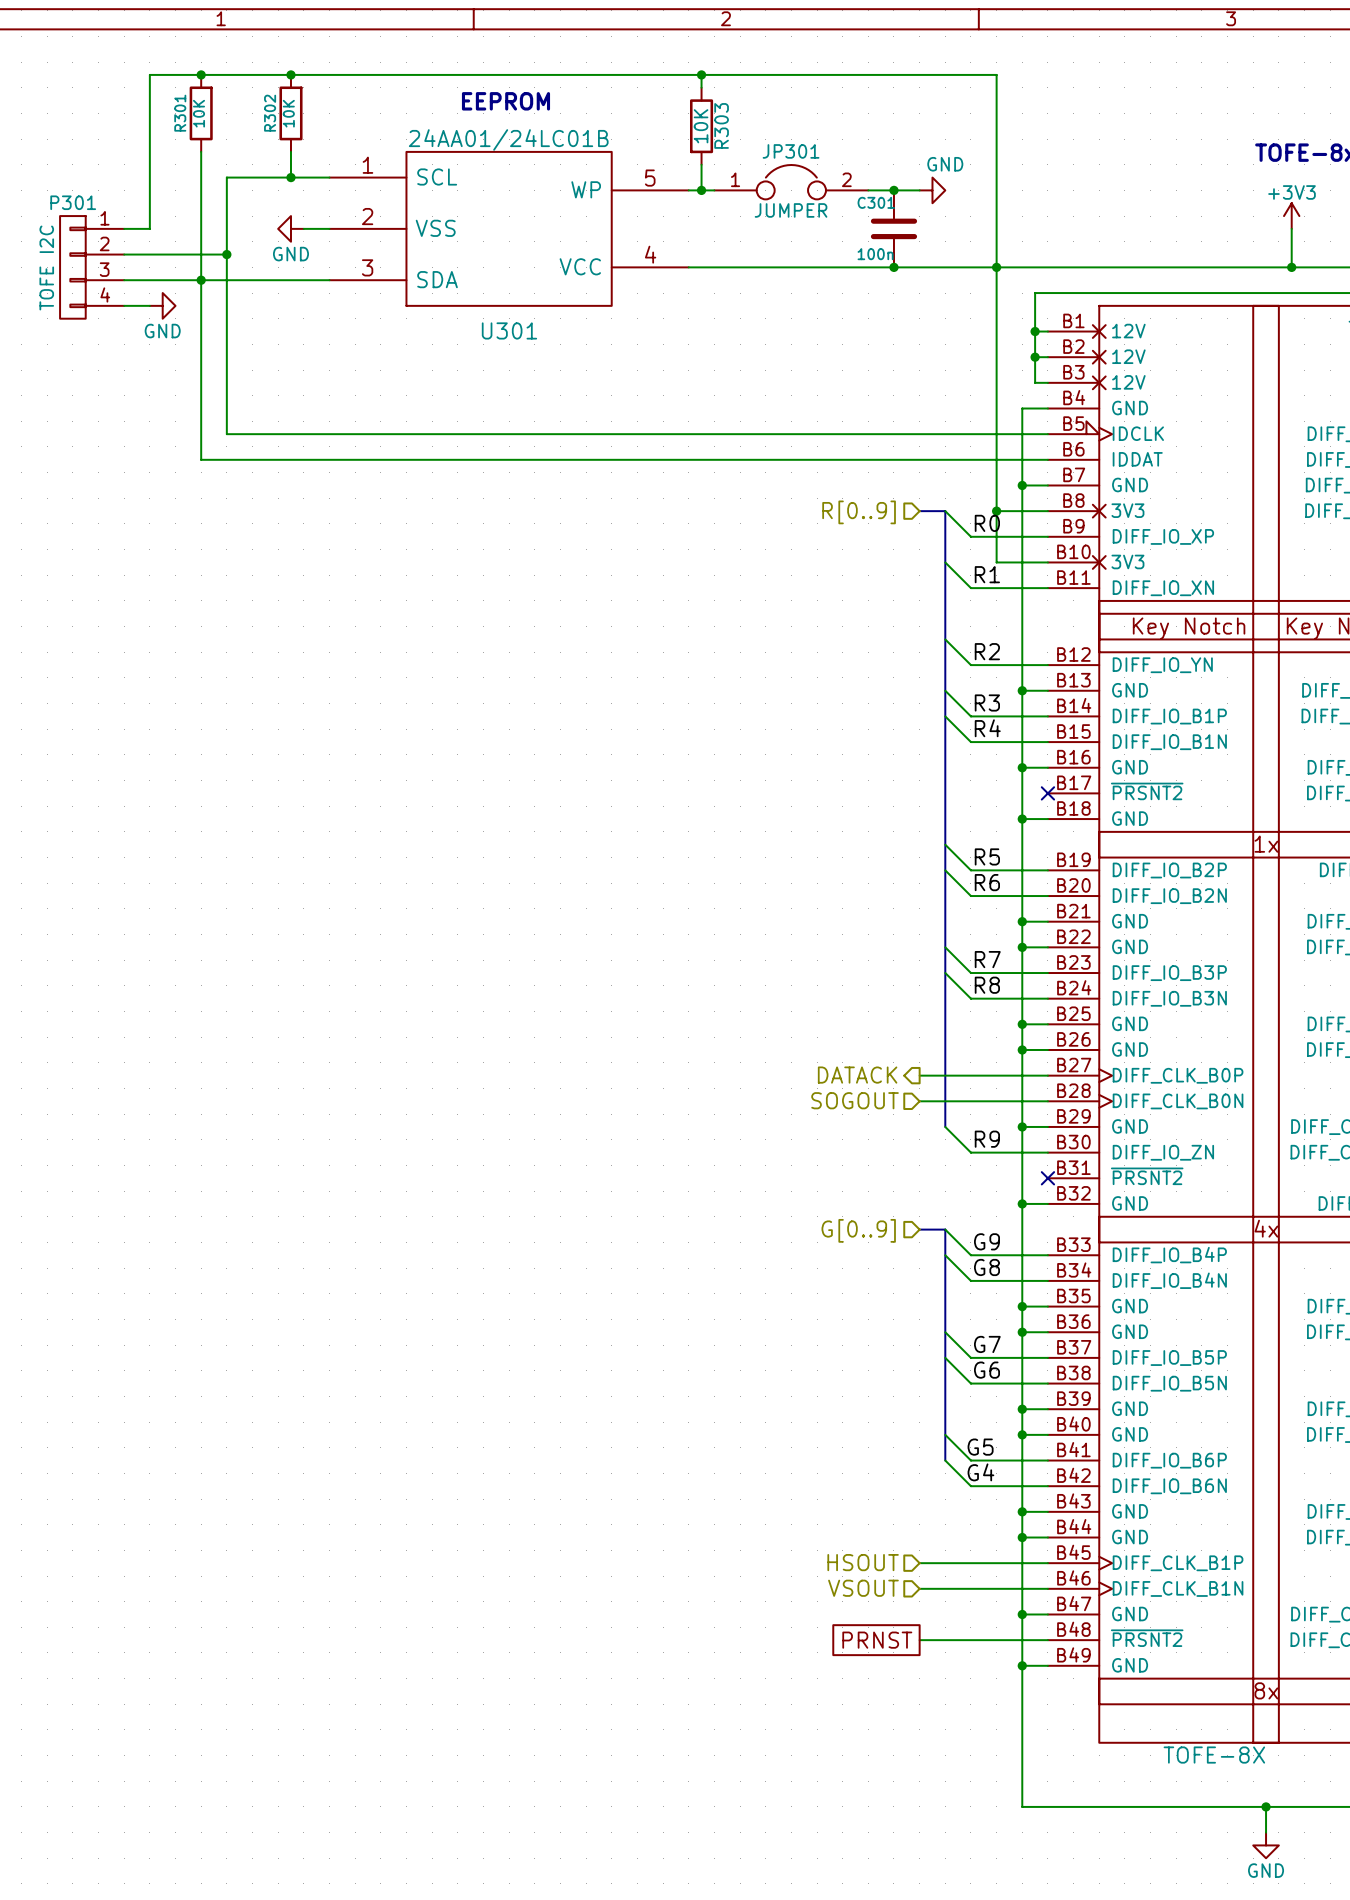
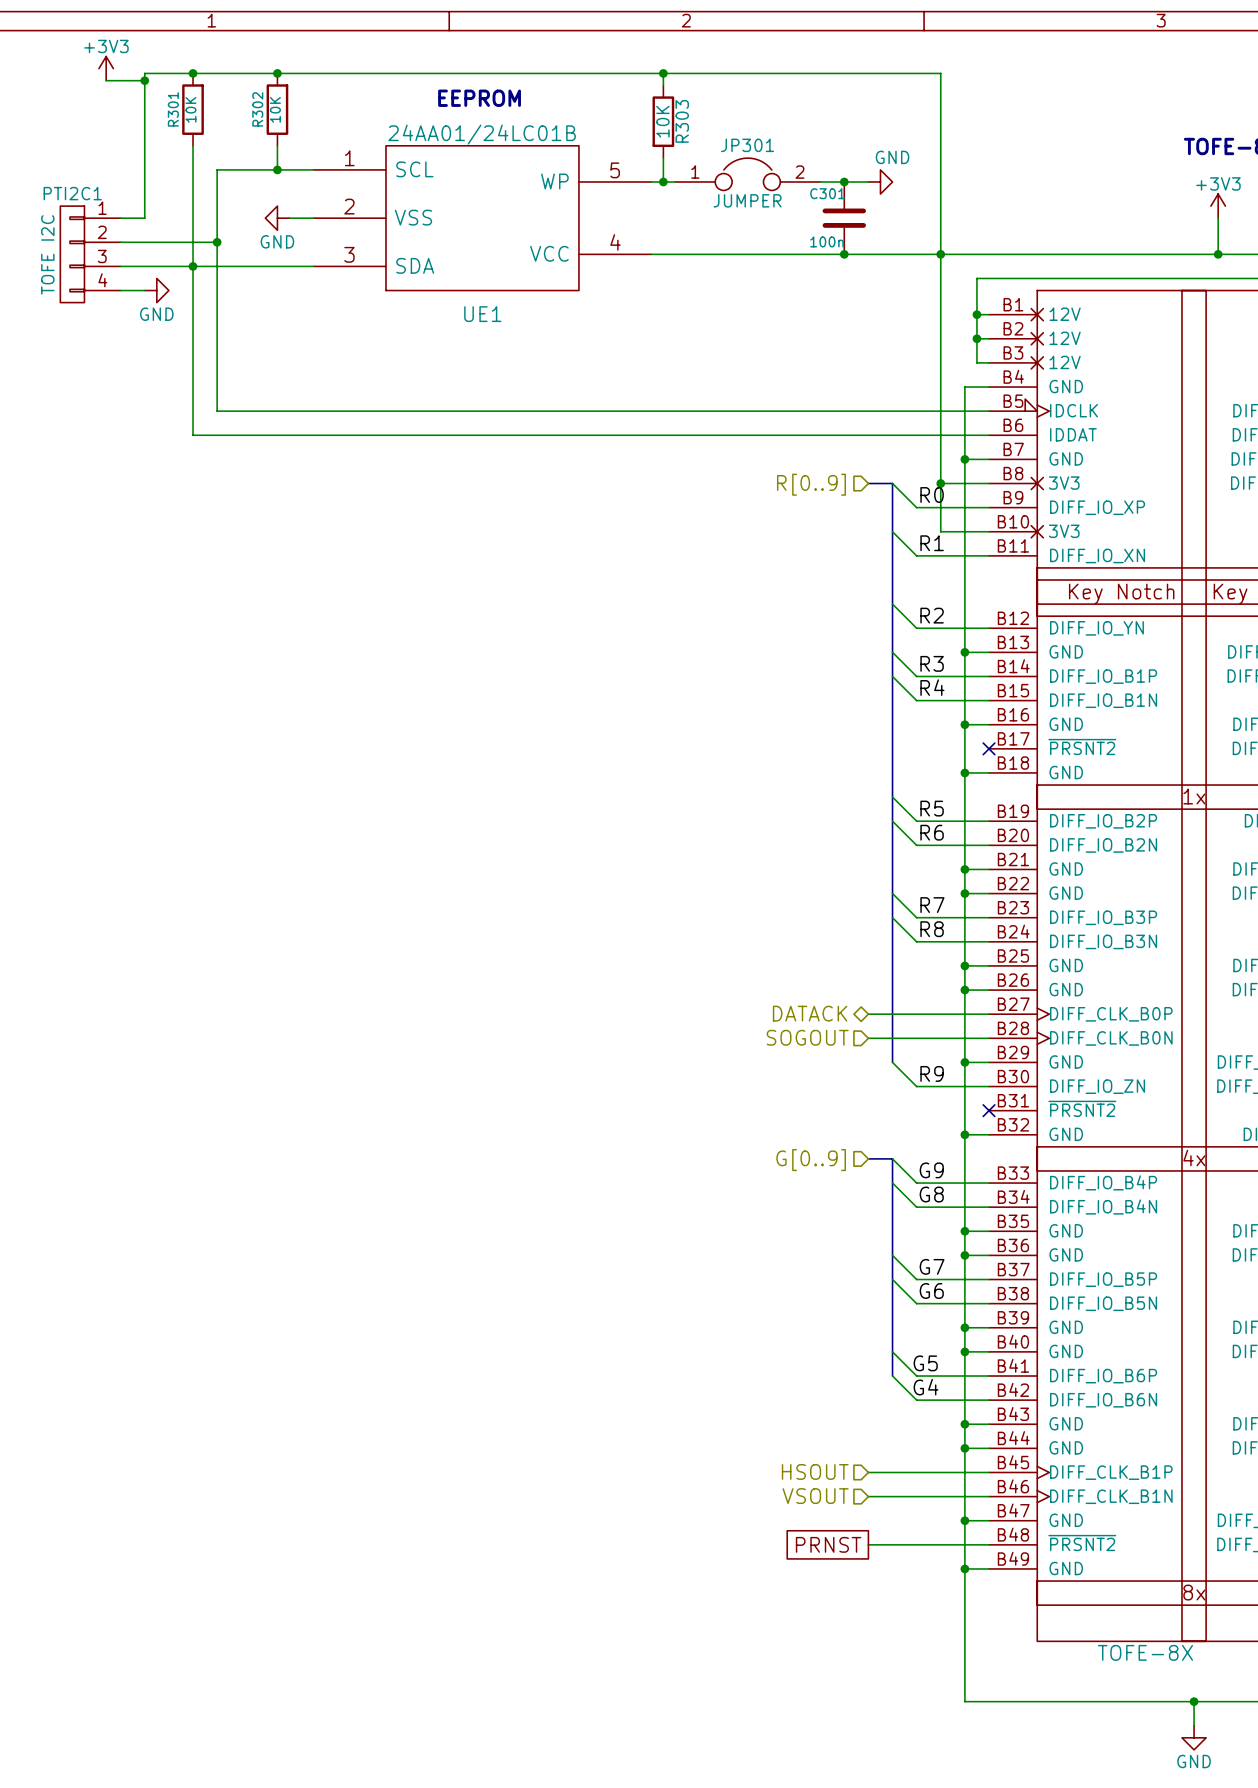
power symbol: none -> +3V3 (106, 68)
wire: none -> (106, 80) (144, 80)
junction: none -> (144, 80)
P301 name: P301 (73, 202) -> PTI2C1 (72, 193)
U301 name: U301 (509, 330) -> UE1 (482, 314)
hierarchical label shape: output (857, 1075) -> bidirectional (810, 1013)

